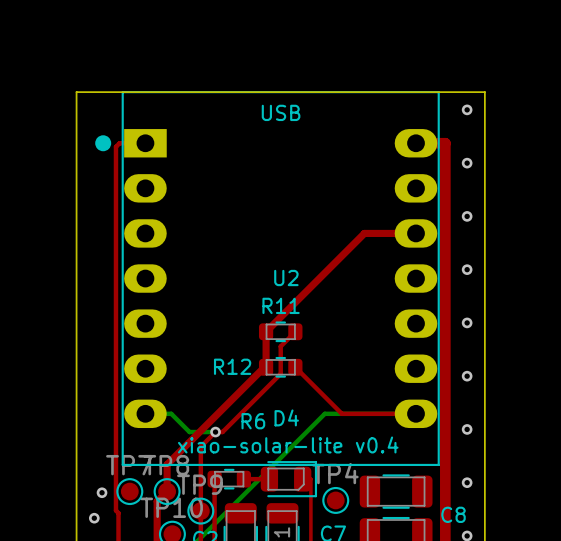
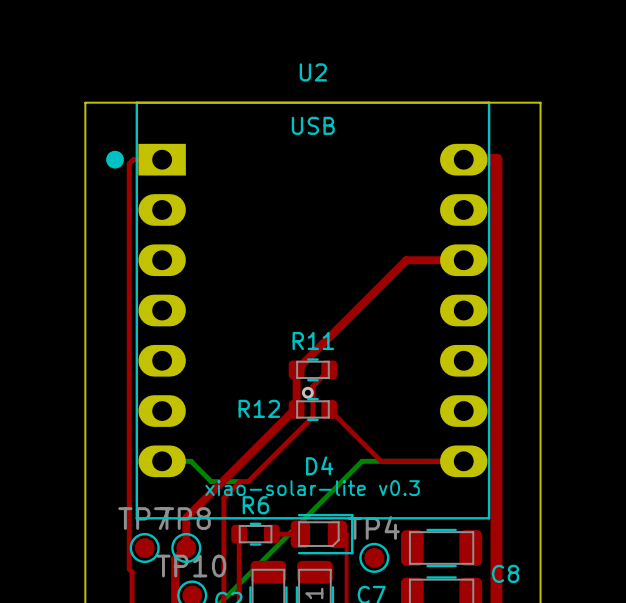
via: (467, 109) -> none
via: (467, 163) -> none
via: (467, 216) -> none
via: (467, 269) -> none
U2 name position: U2 (286, 278) -> U2 (313, 72)
via: (467, 322) -> none
via: none -> (307, 392)
via: (467, 376) -> none
R6 name position: R6 (253, 421) -> R6 (255, 505)
via: (467, 429) -> none
via: (215, 432) -> none
text: xiao-solar-lite v0.4 (288, 444) -> xiao-solar-lite v0.3 (312, 488)
via: (467, 482) -> none
via: (102, 492) -> none
TP9: (200, 511) -> none
via: (94, 518) -> none
via: (467, 535) -> none

